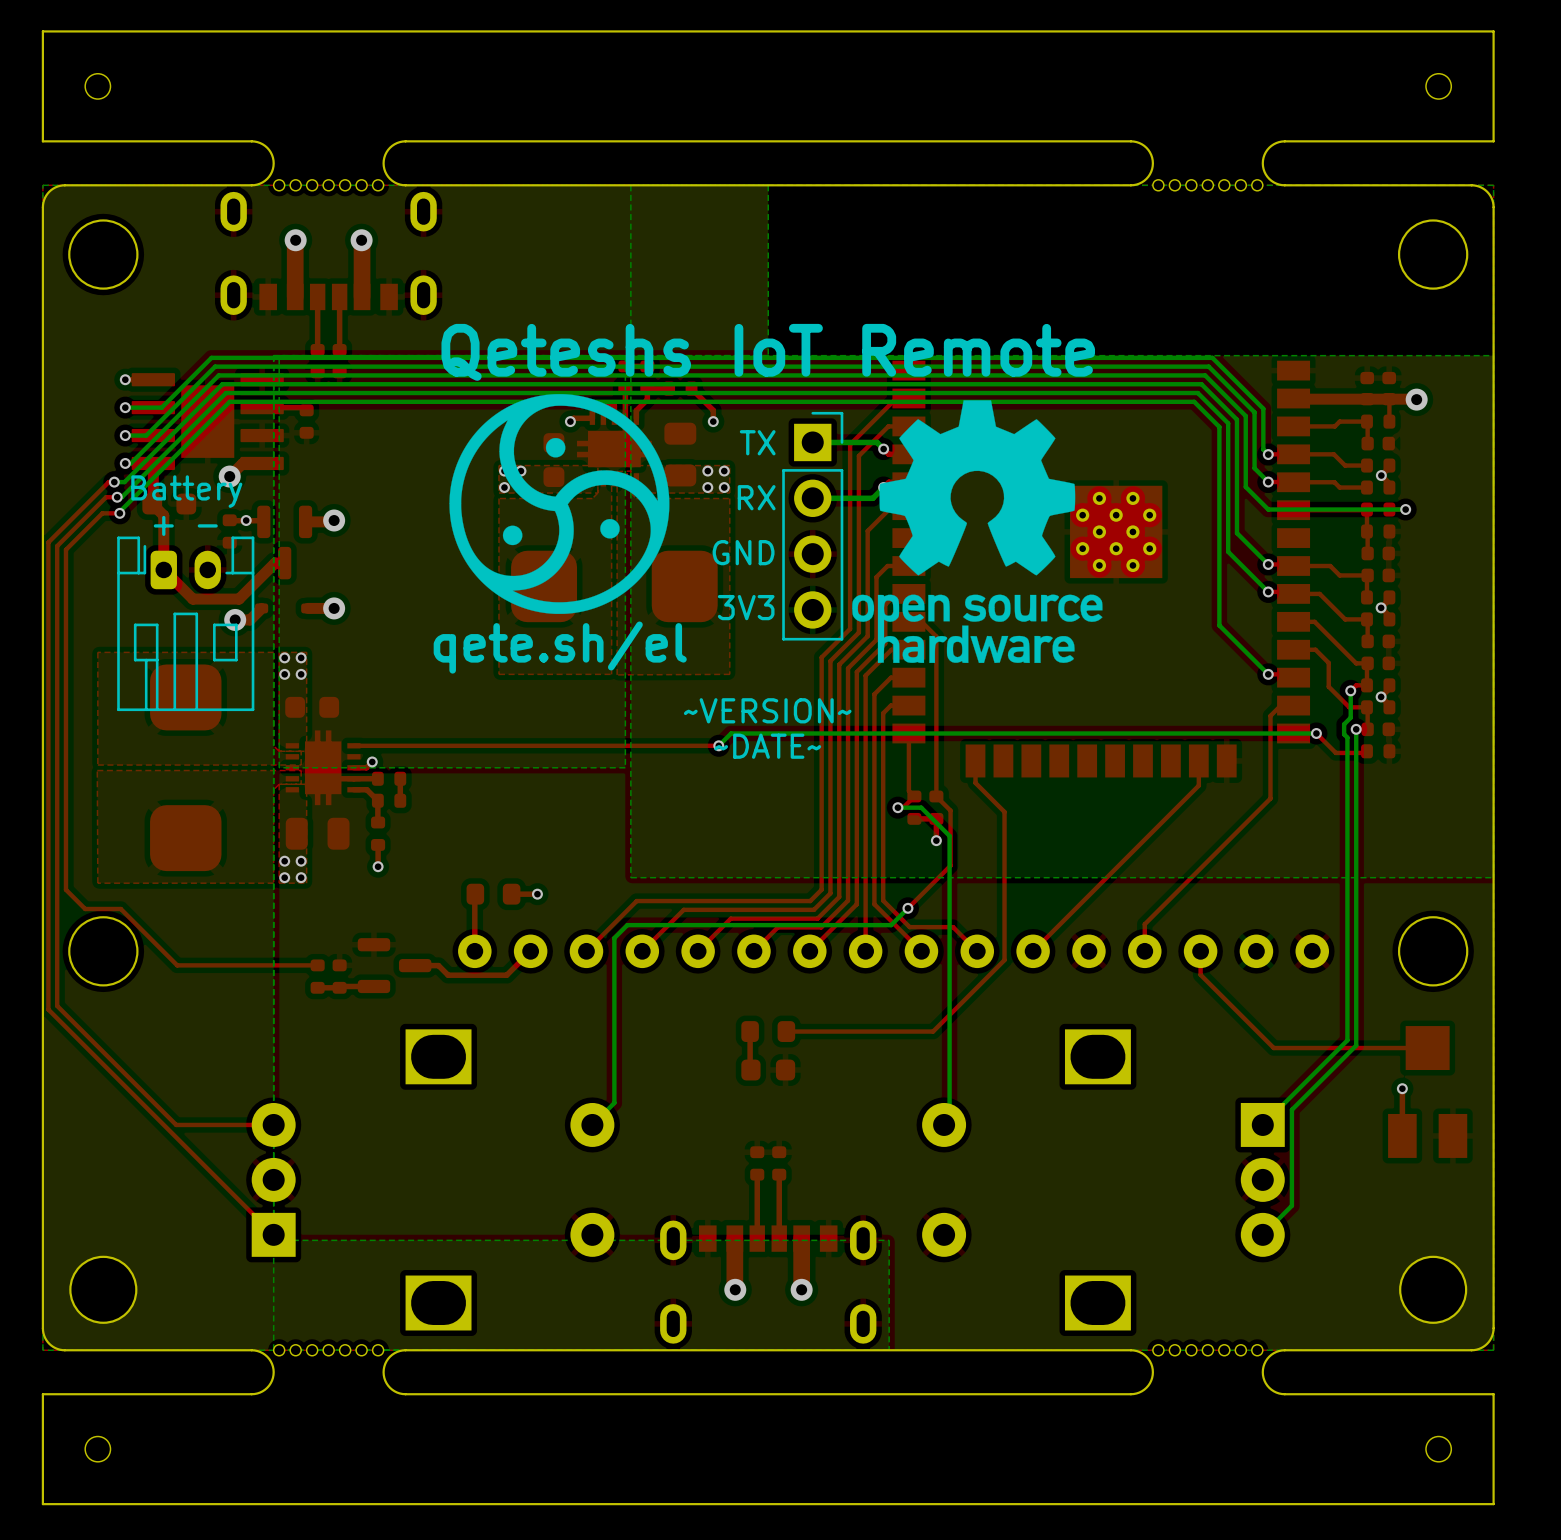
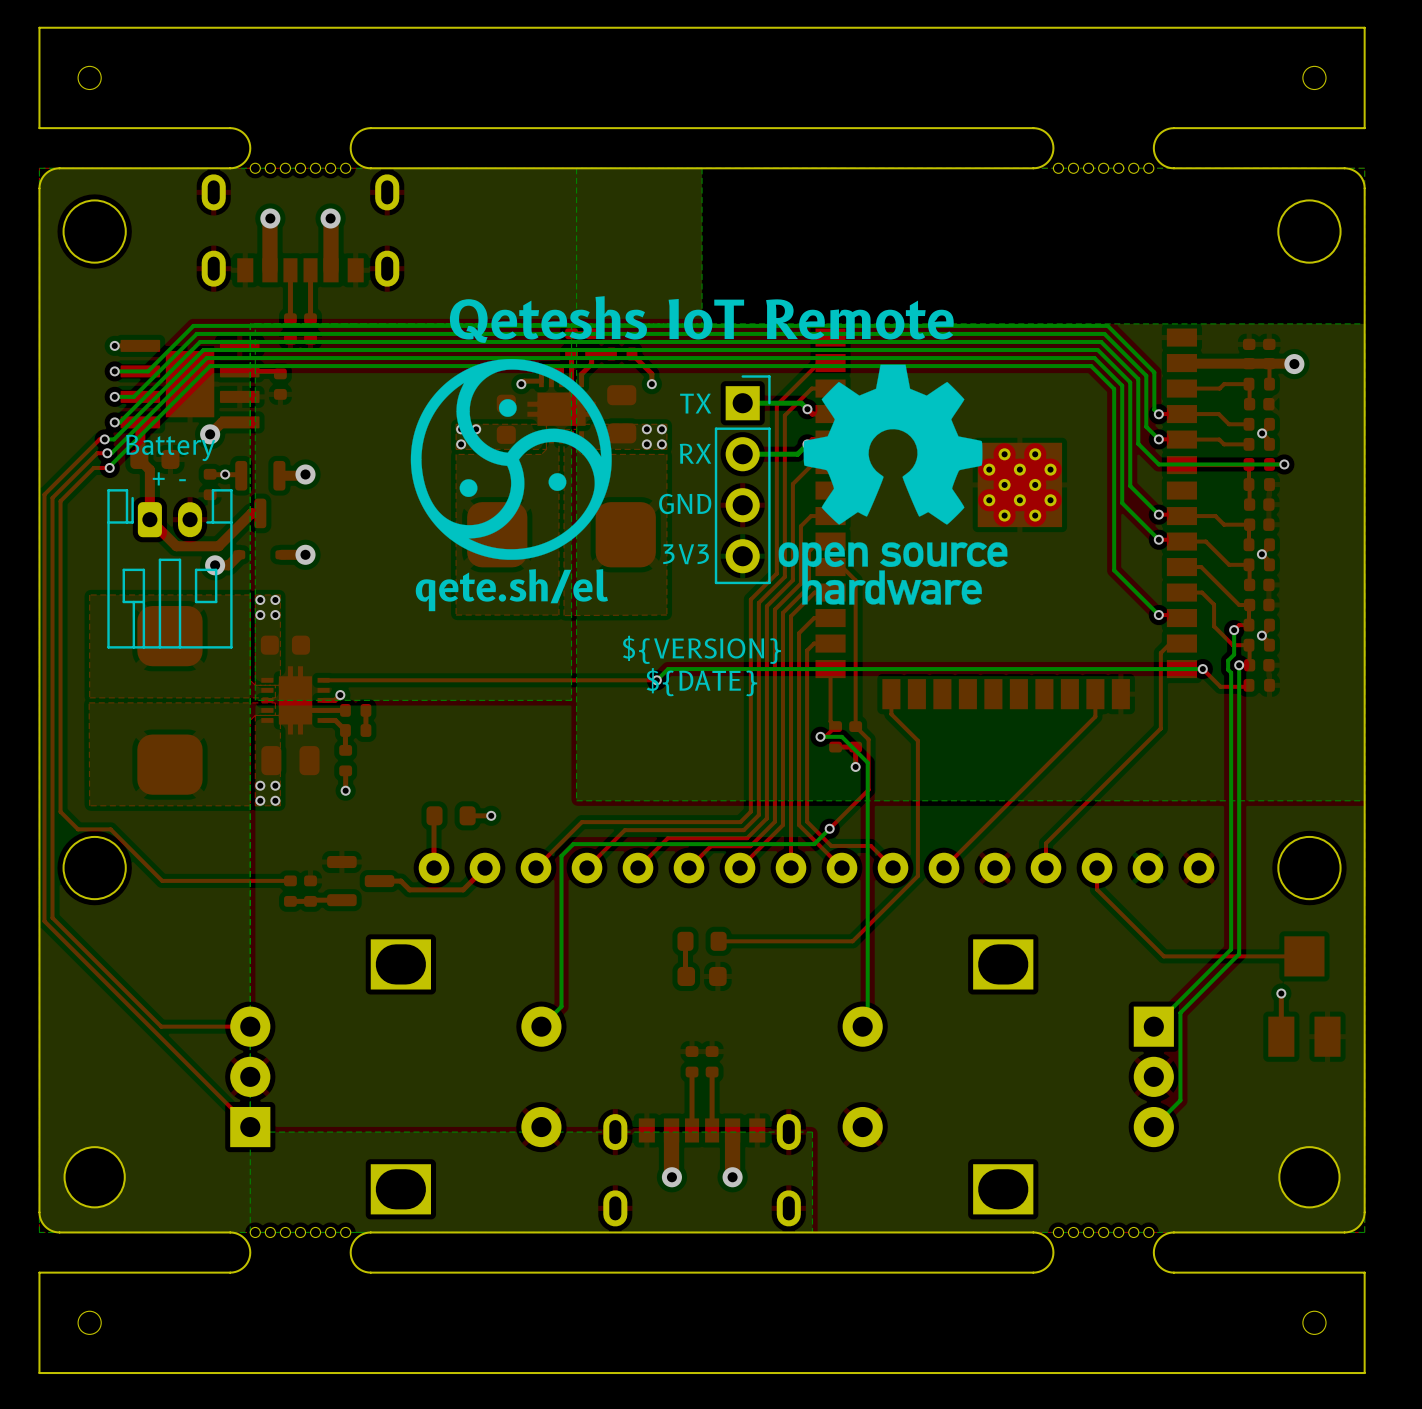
text: ~VERSION~ (767, 710) -> ${VERSION} (701, 649)
text: ~DATE~ (767, 746) -> ${DATE} (701, 682)

